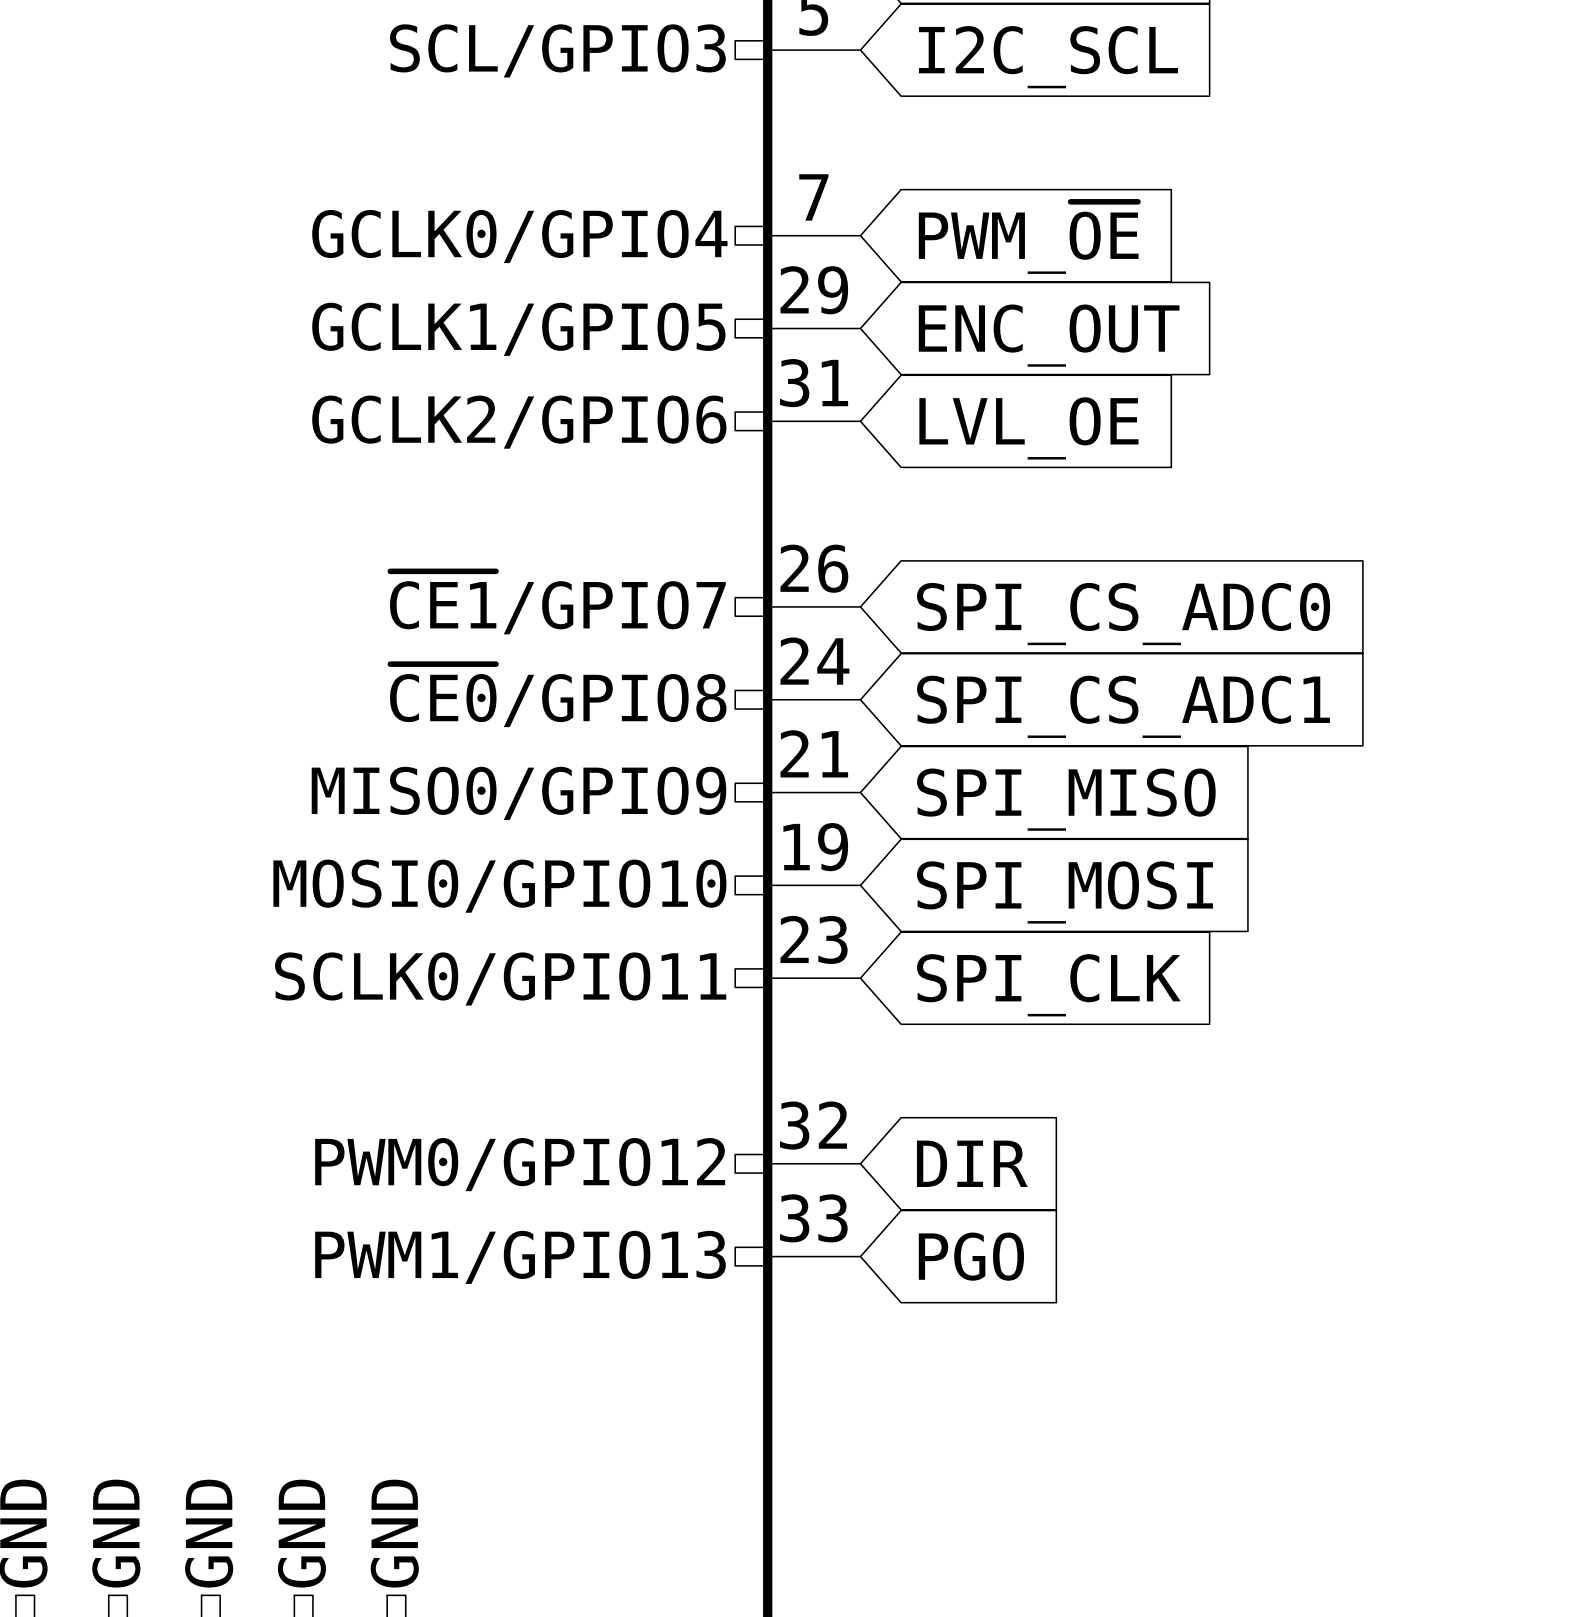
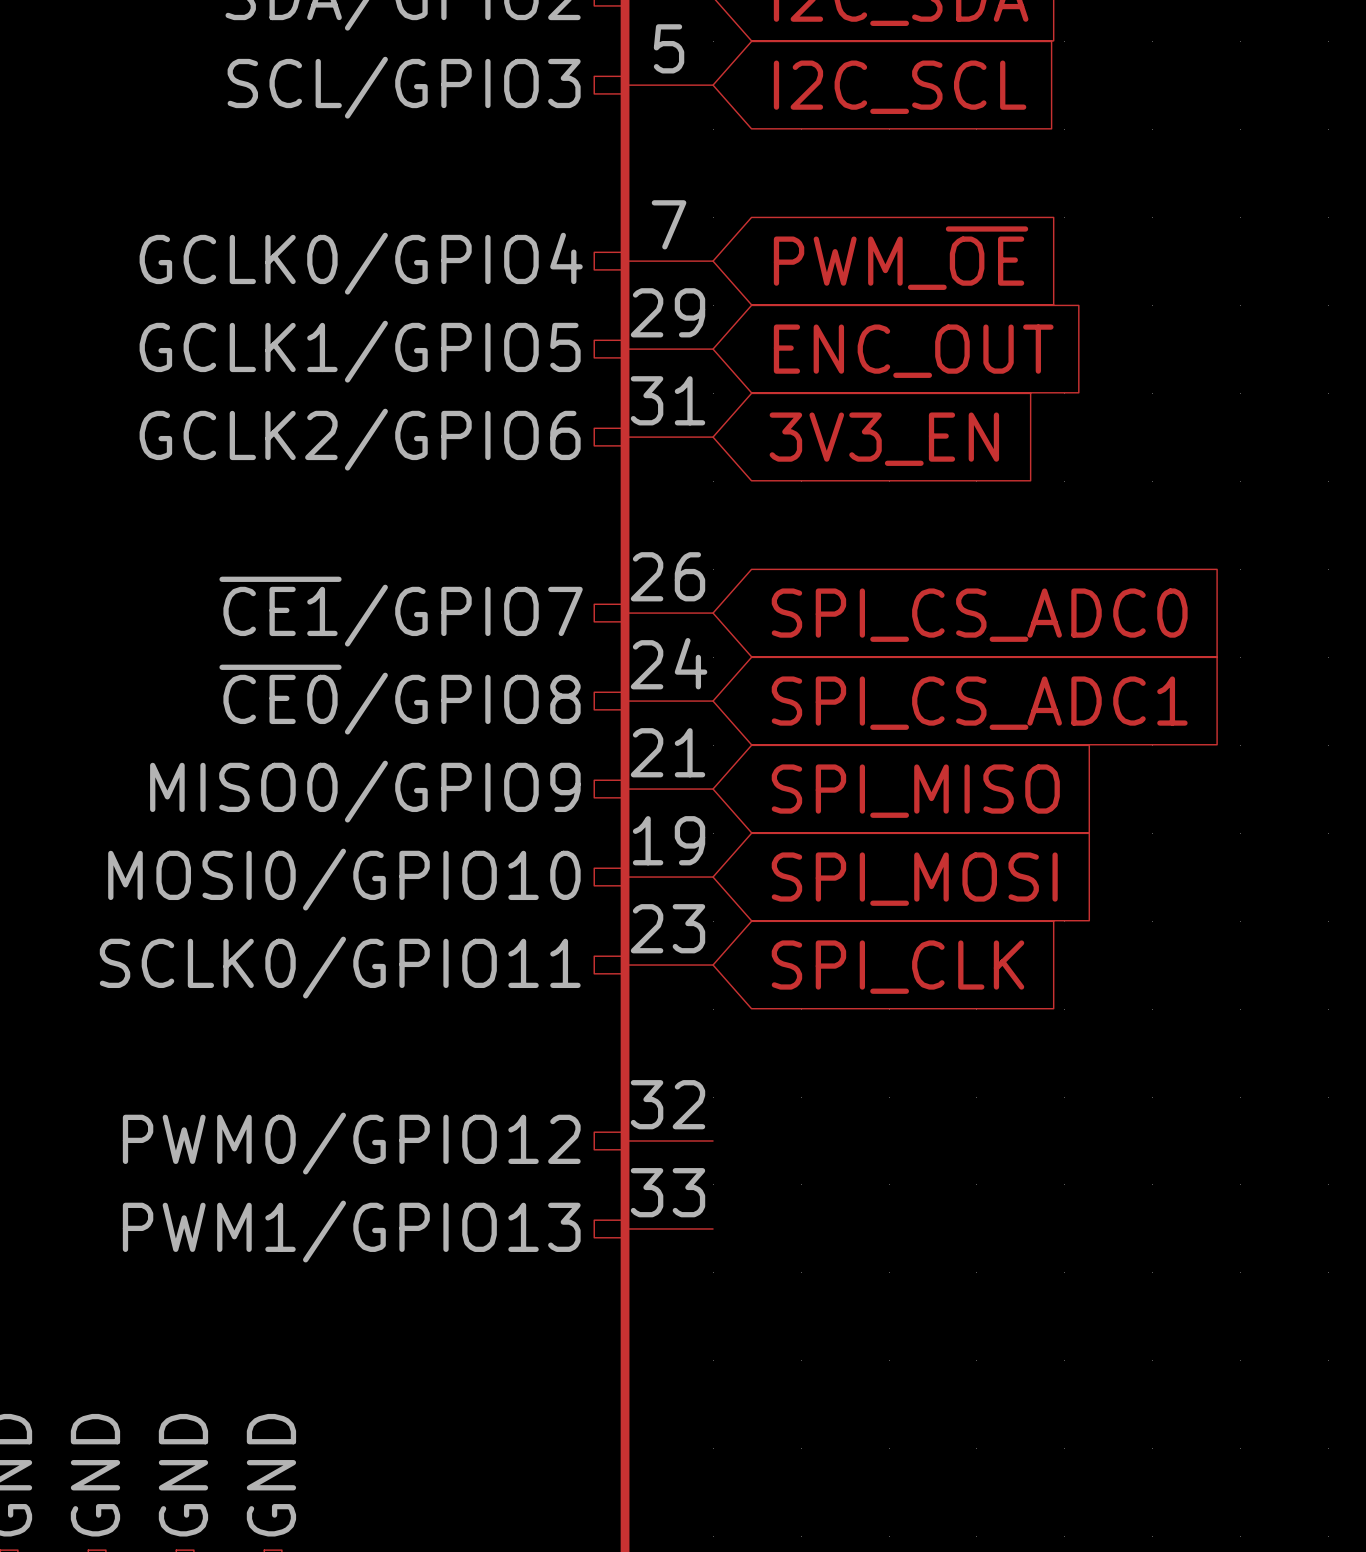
global label: LVL_OE (1028, 428) -> 3V3_EN (884, 439)
global label: DIR (972, 1163) -> none
global label: PGO (971, 1256) -> none

